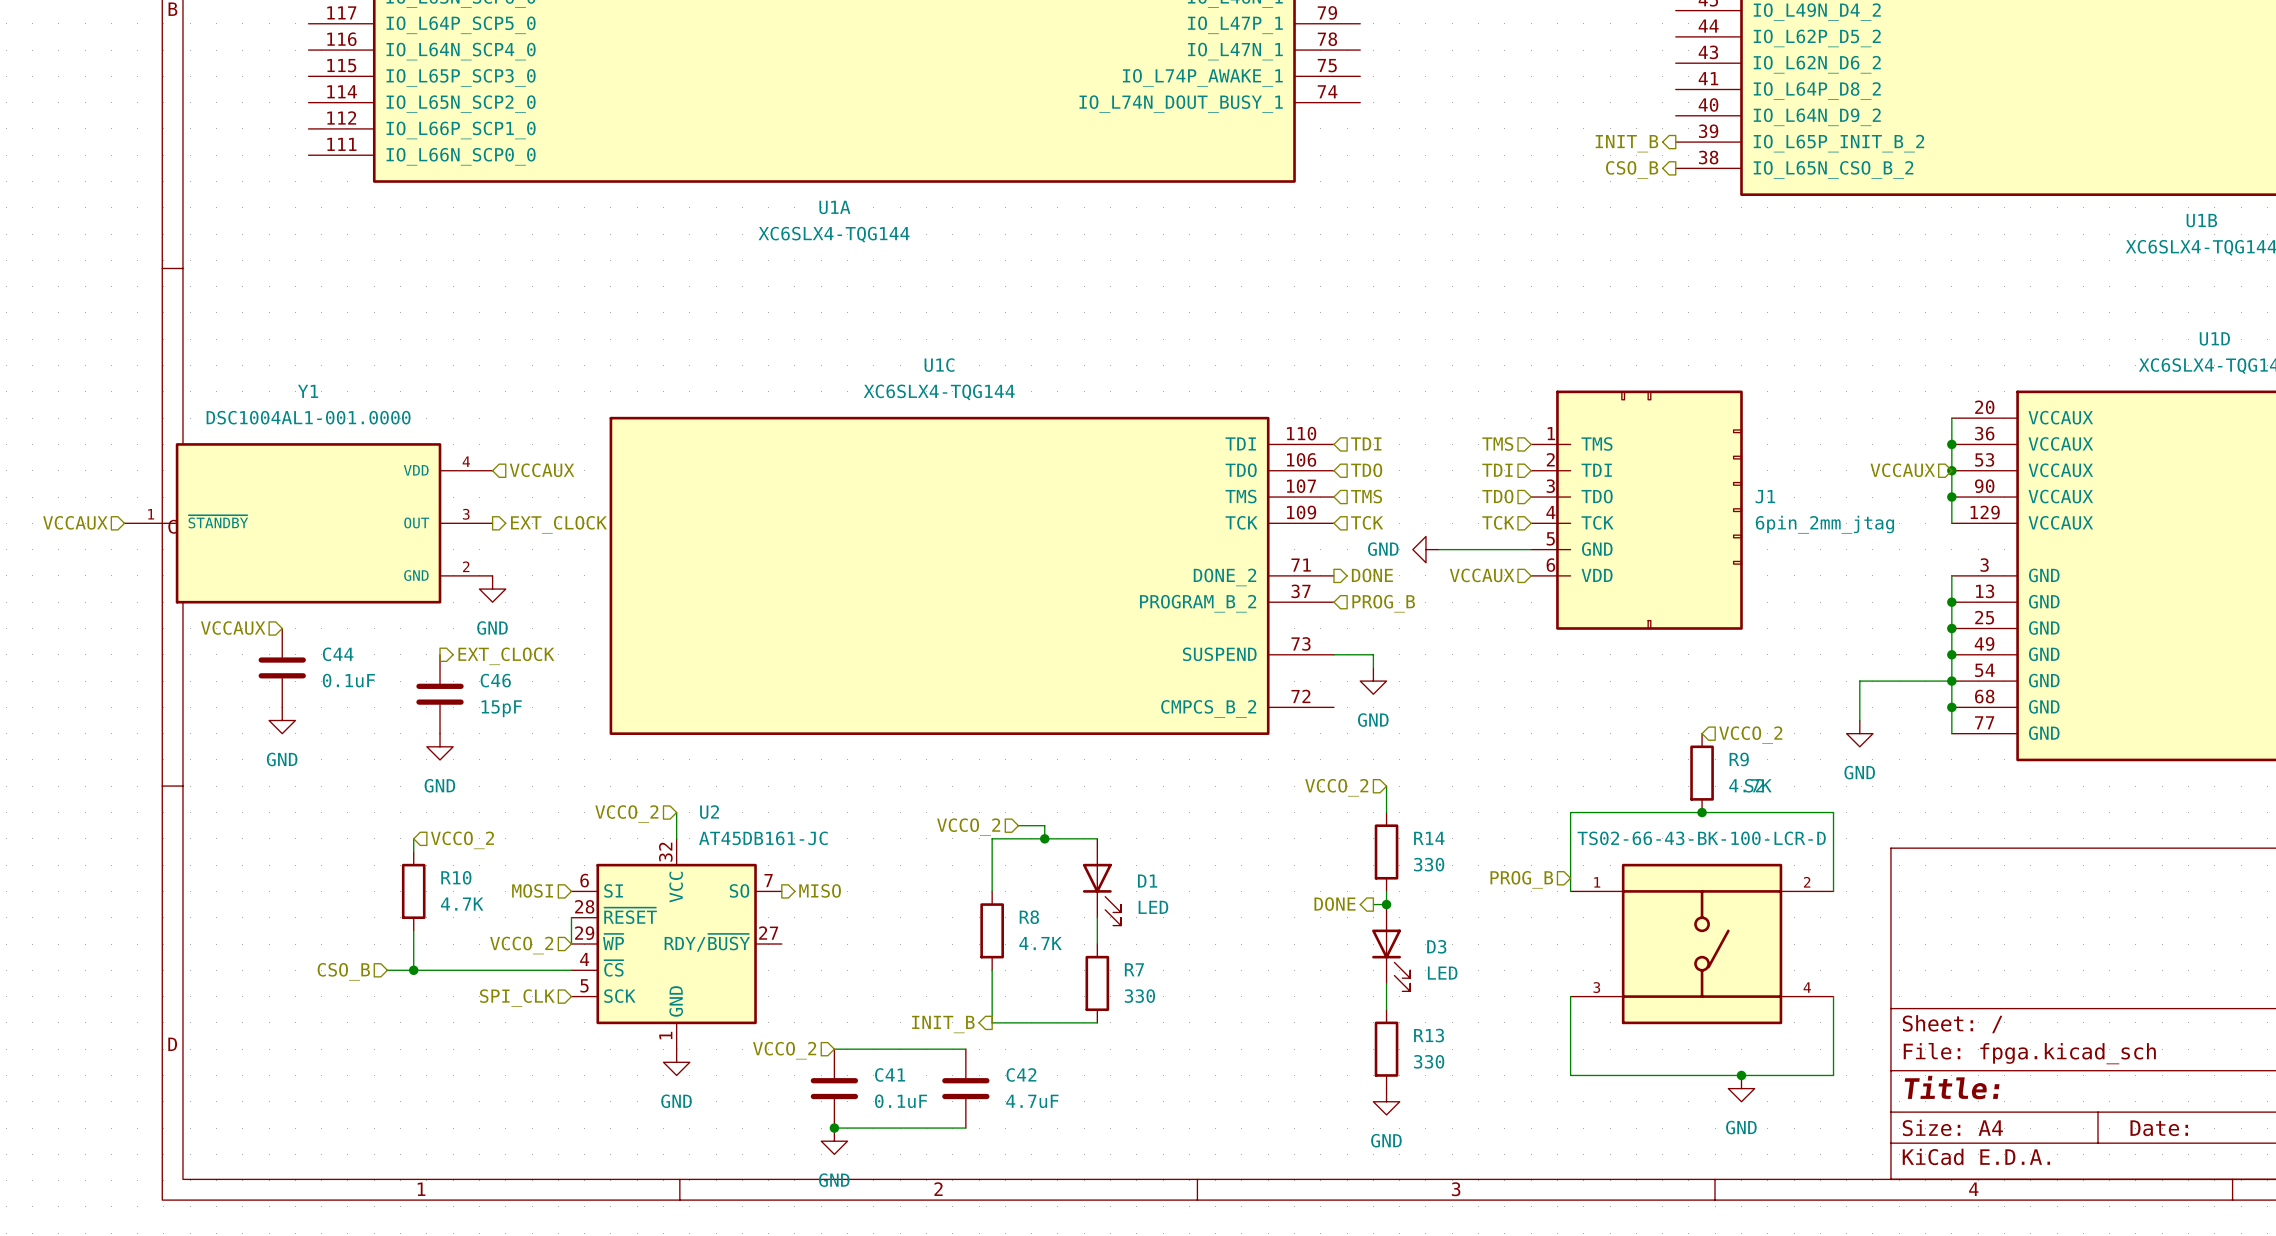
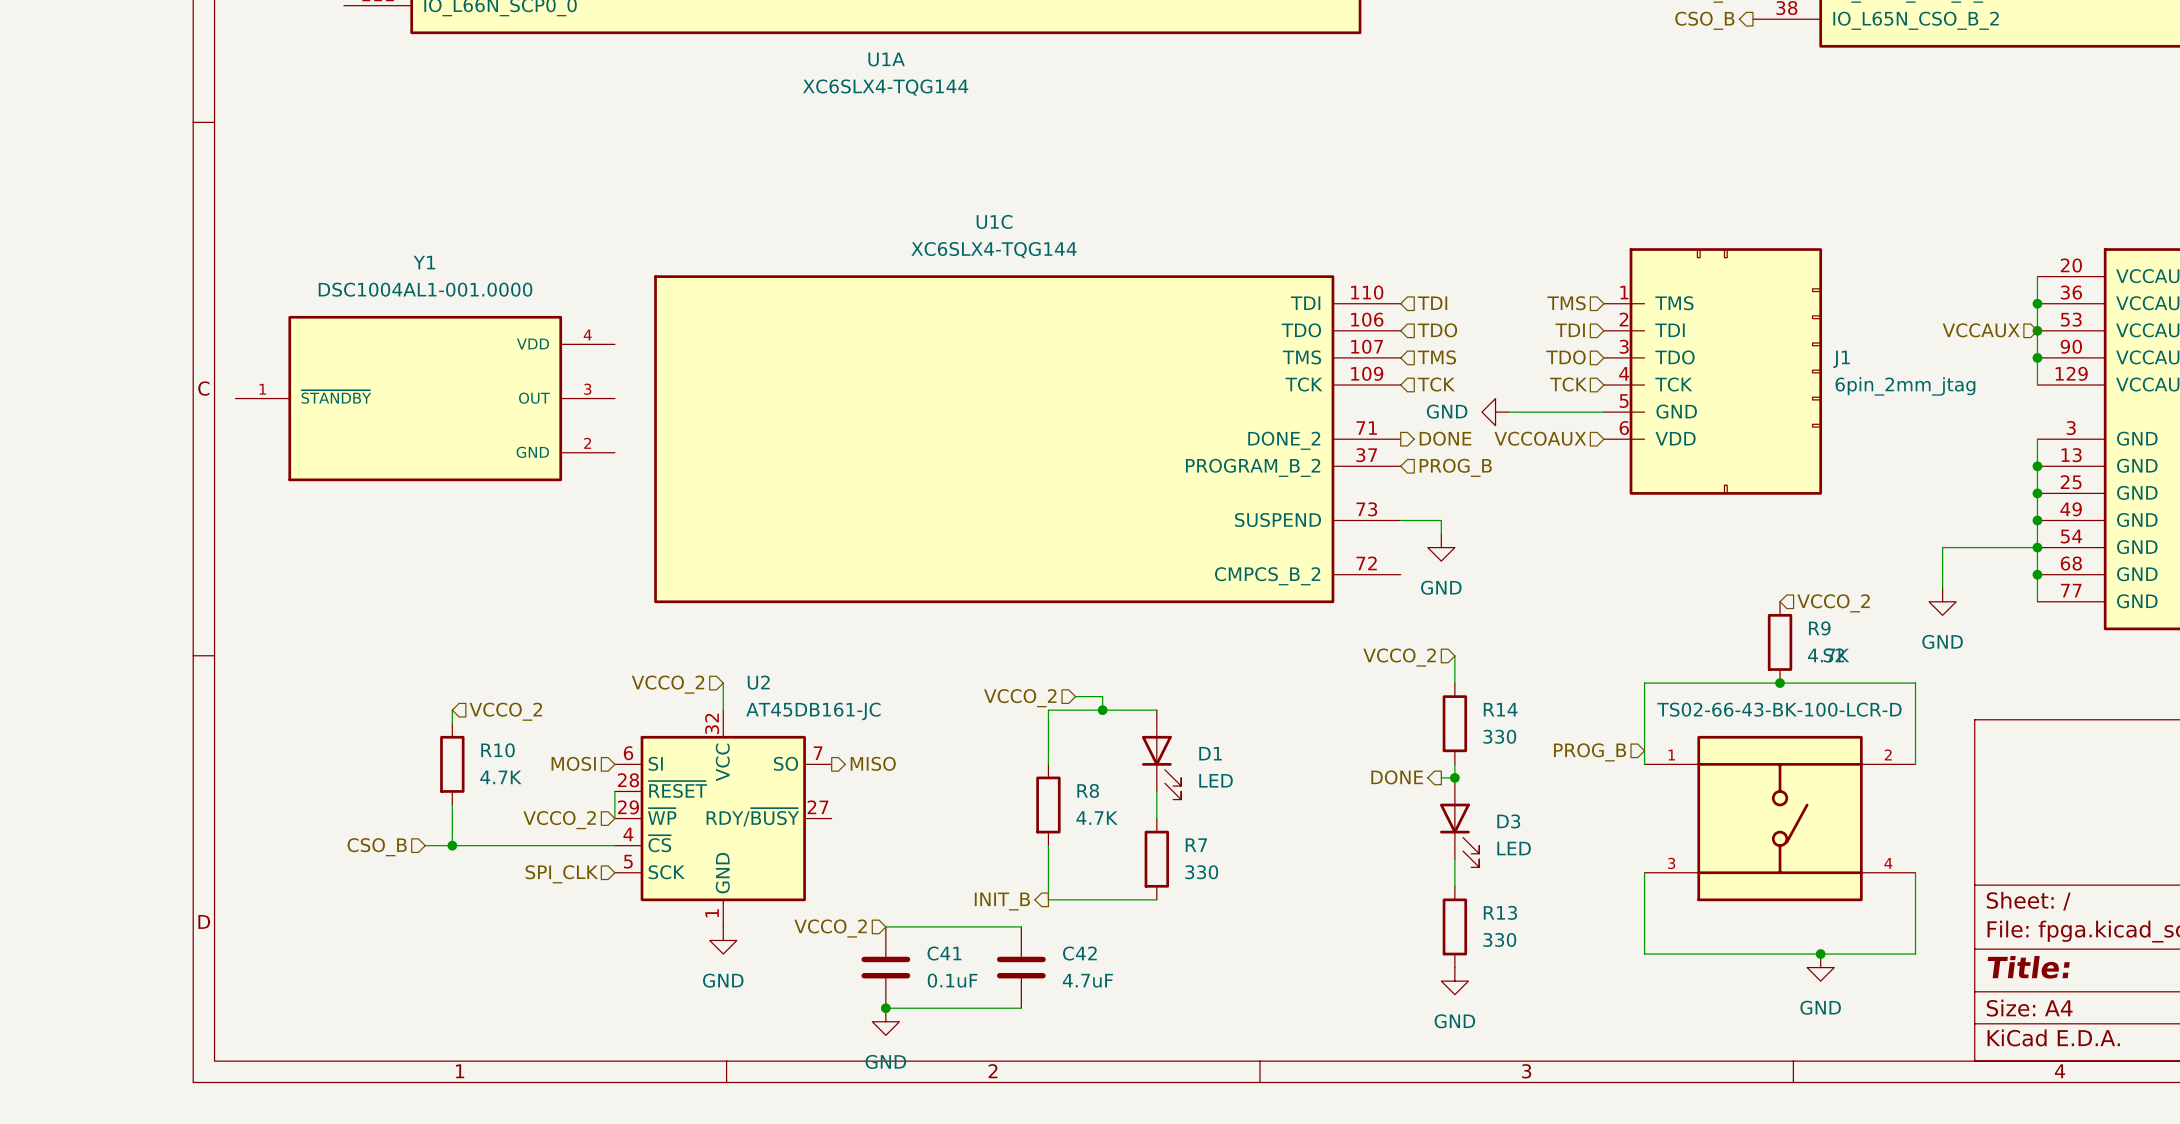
hierarchical label: VCCAUX (542, 470) -> none
hierarchical label: VCCAUX (75, 522) -> none
Y1 position: (308, 523) -> (425, 398)
hierarchical label: EXT_CLOCK (558, 524) -> none
hierarchical label: VCCAUX (1482, 575) -> VCCOAUX (1540, 438)
power symbol: GND (492, 589) -> none
hierarchical label: VCCAUX (233, 628) -> none
hierarchical label: EXT_CLOCK (506, 656) -> none
C44: 0.1uF (282, 667) -> none
C46: 15pF (440, 694) -> none
power symbol: GND (282, 720) -> none
power symbol: GND (440, 746) -> none

